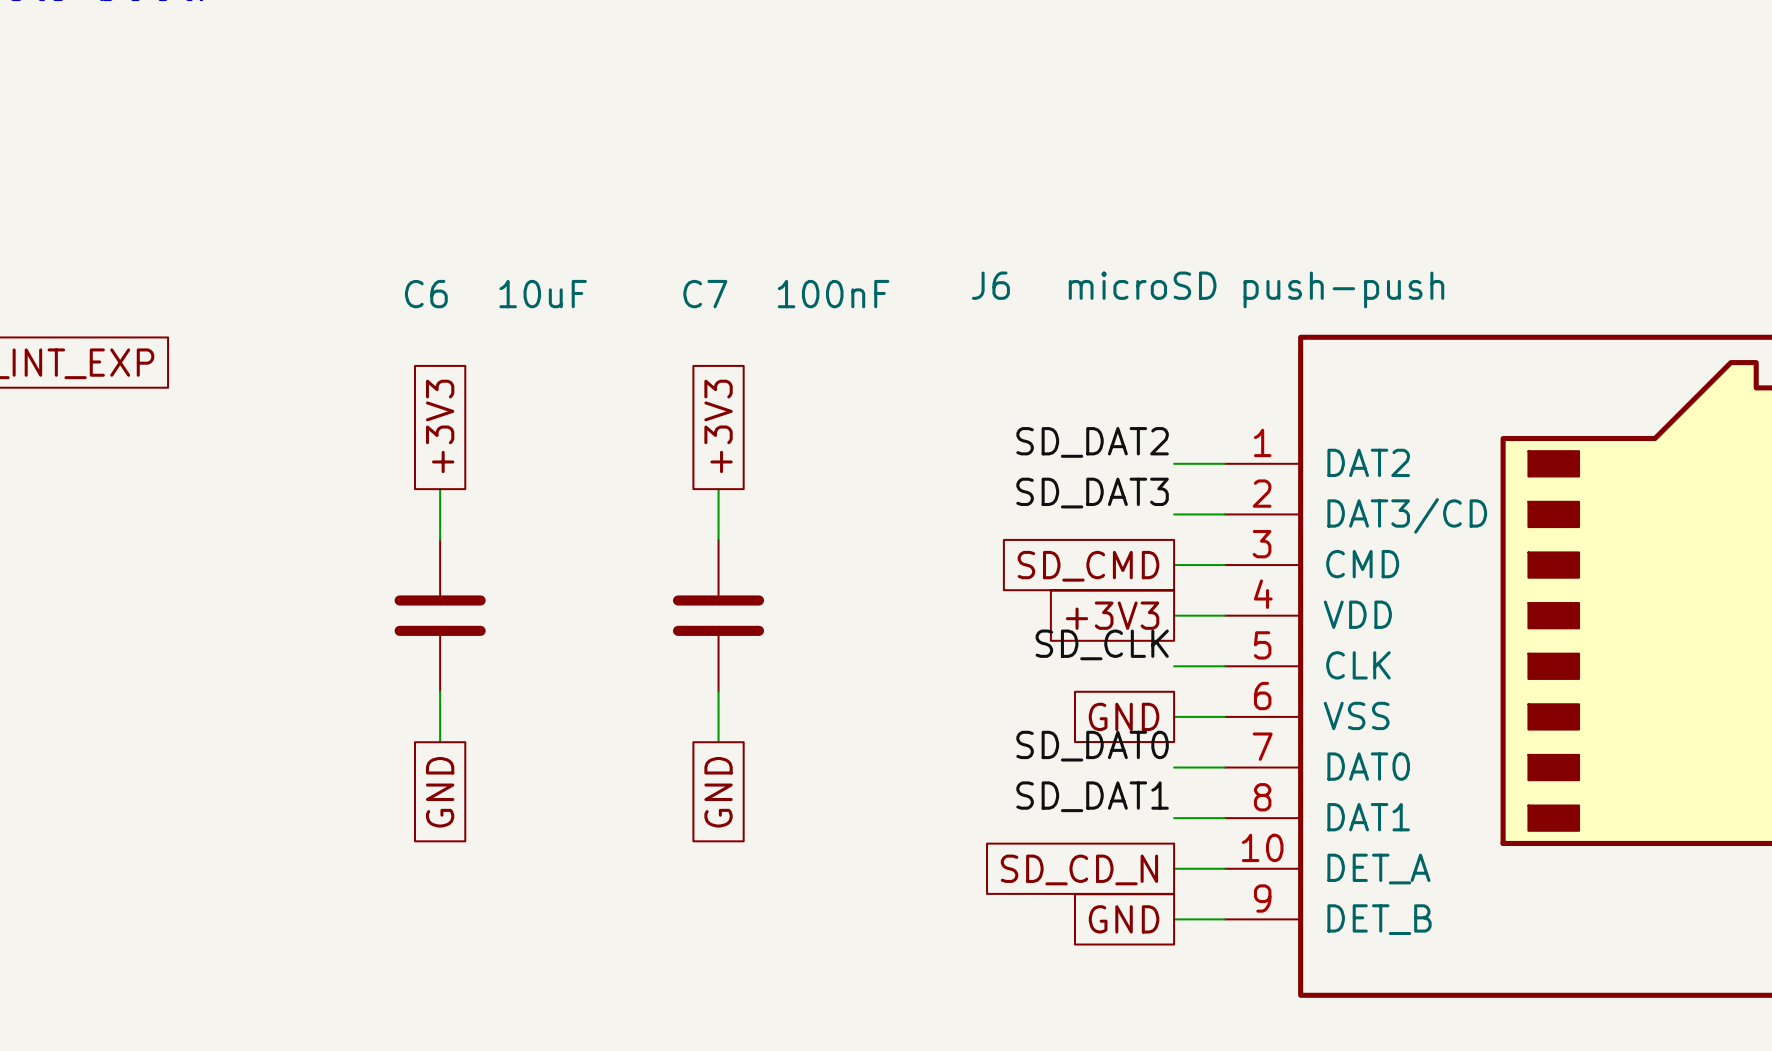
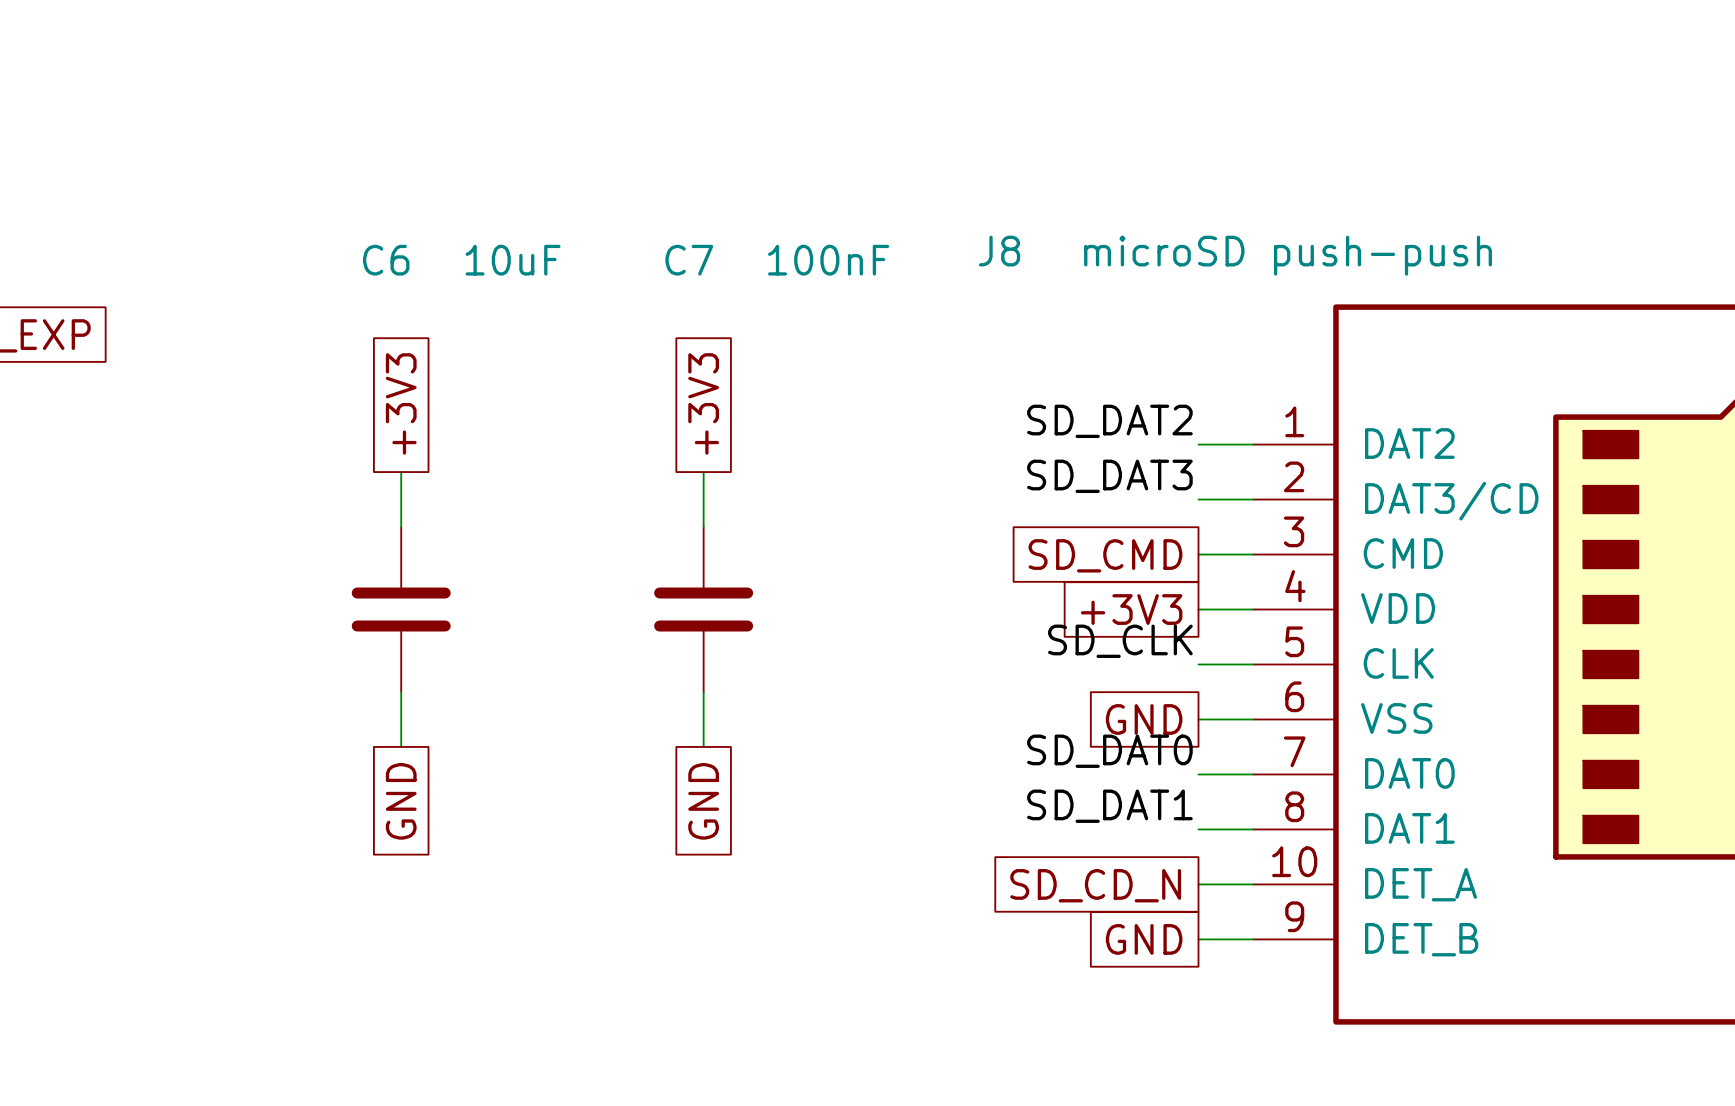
J6 name: J6 (990, 285) -> J8 (999, 251)

